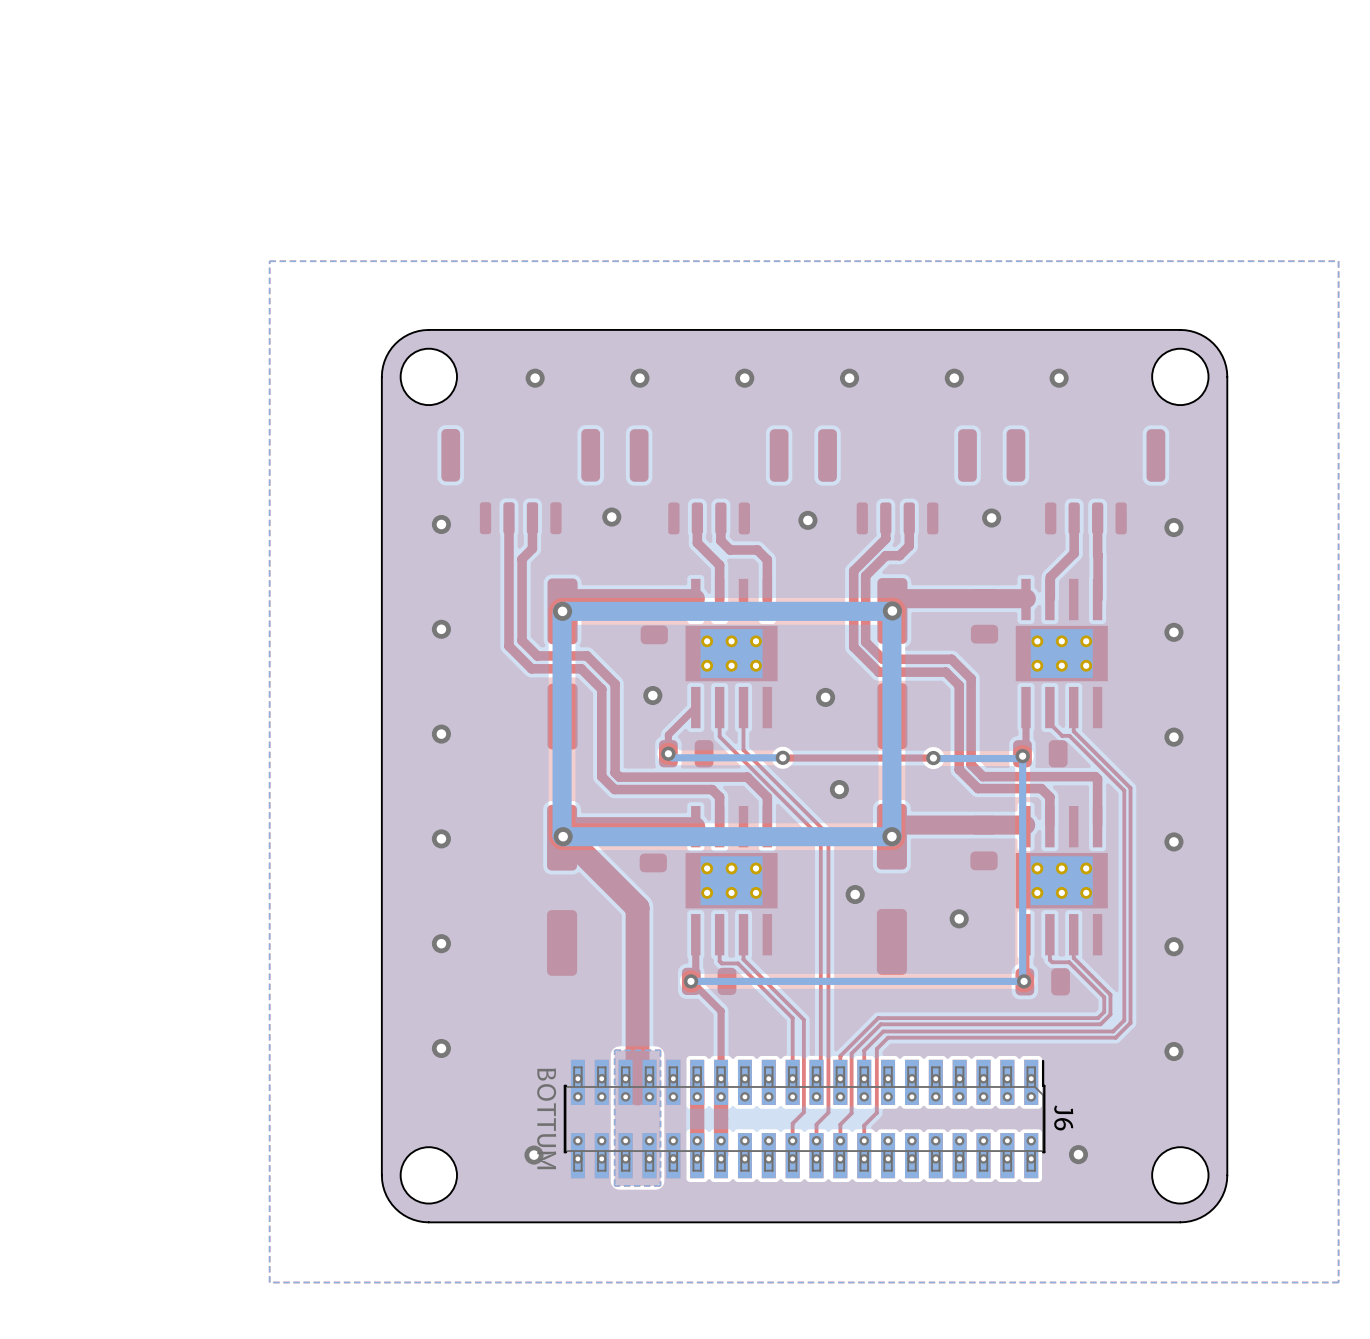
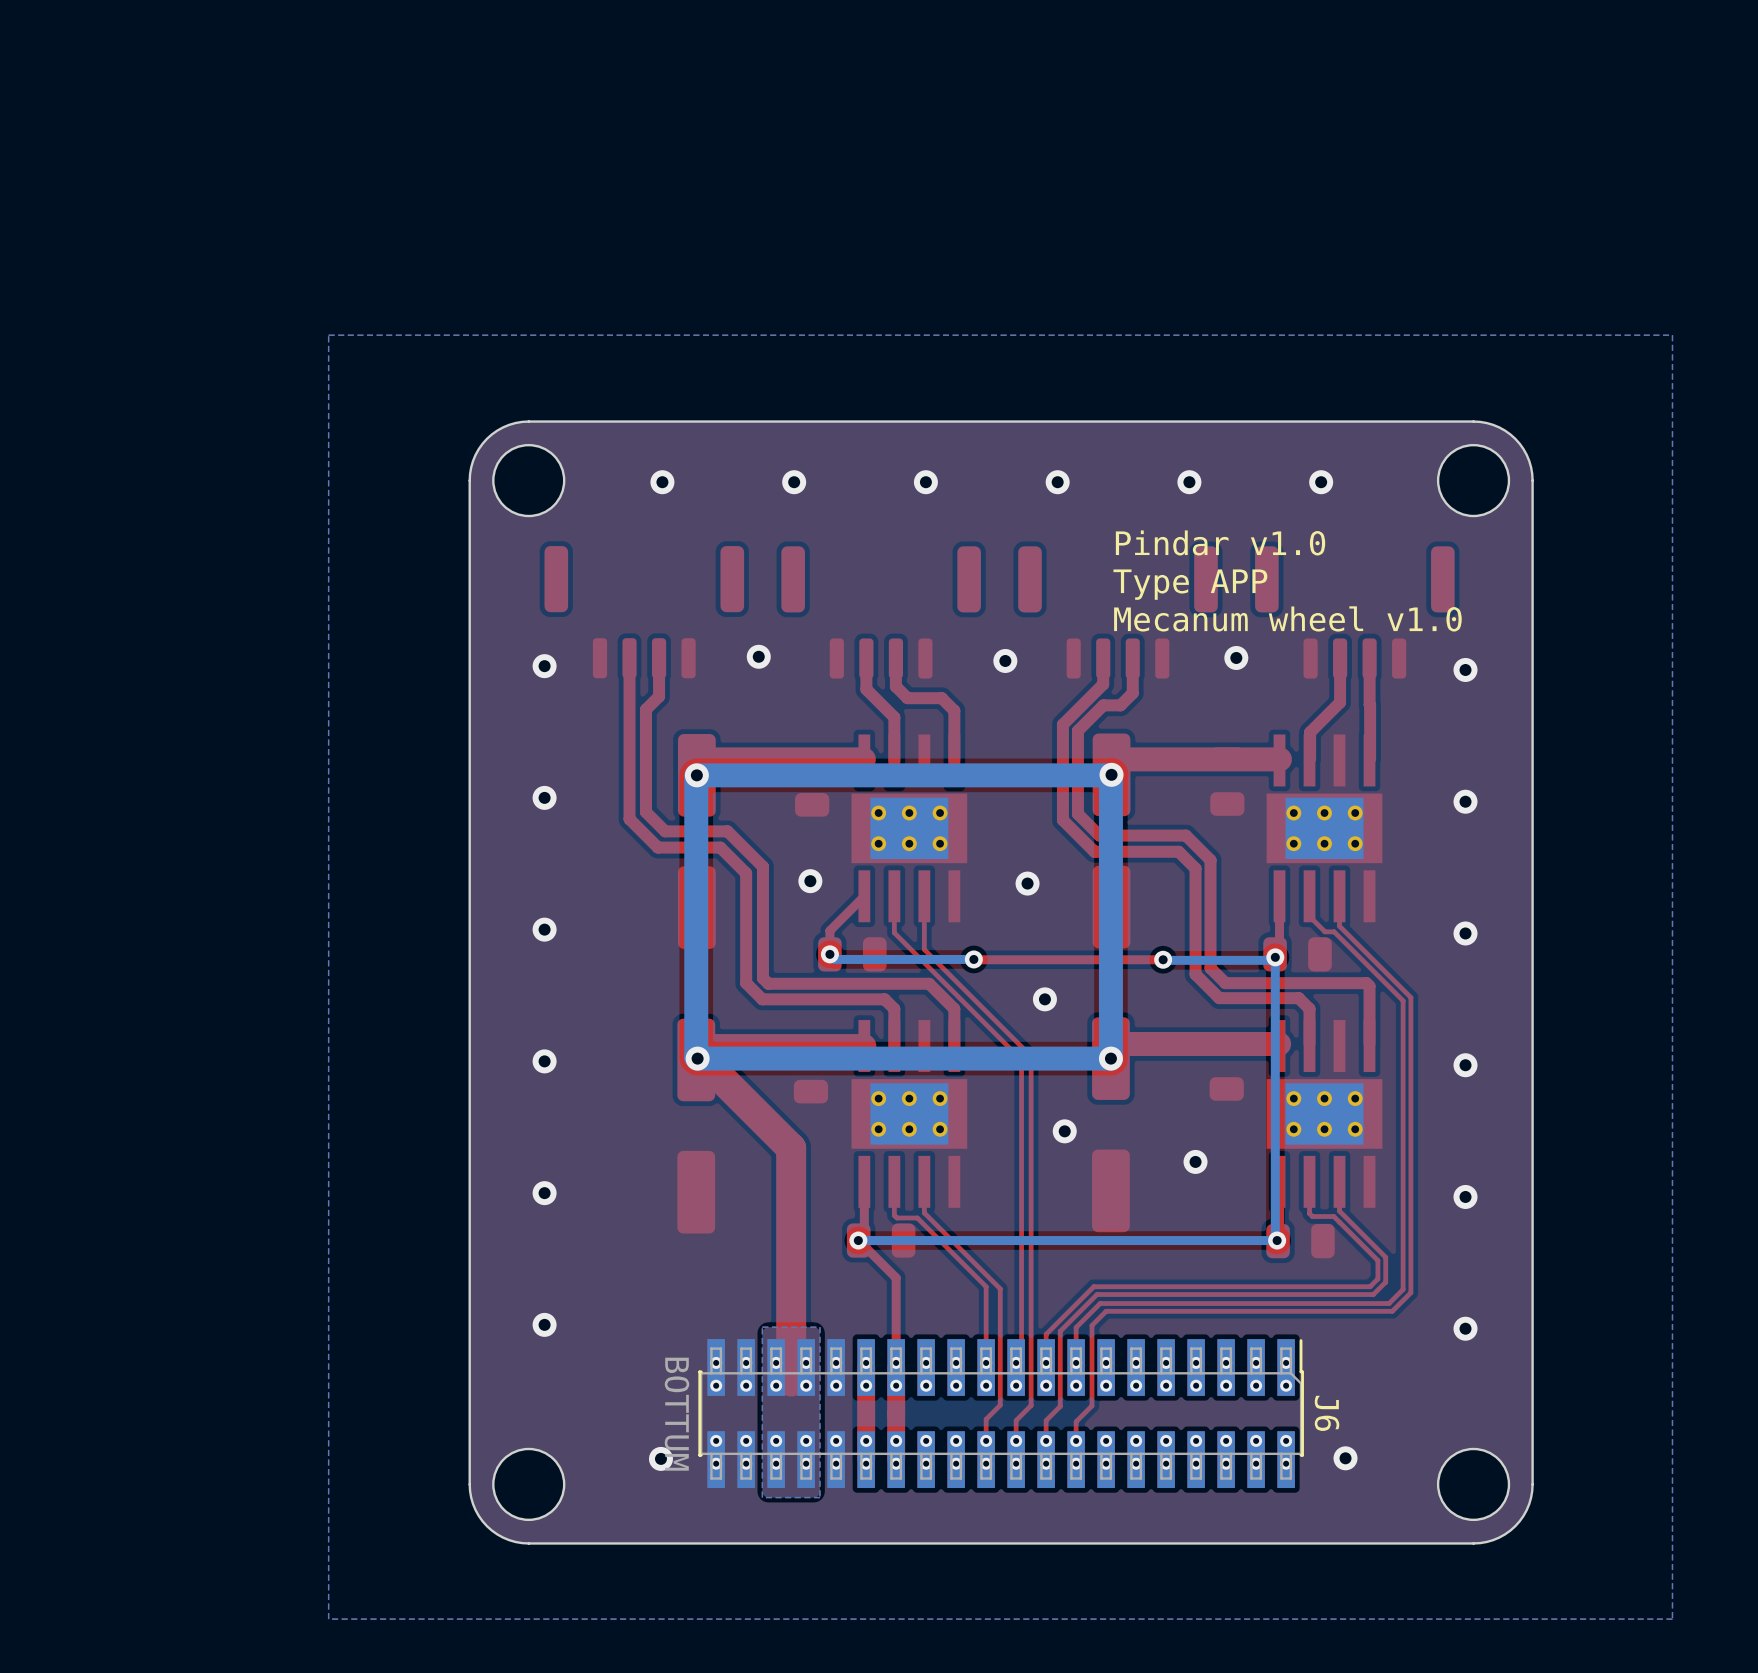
text: none -> Pindar v1.0 (1220, 542)
text: none -> Type APP (1190, 584)
text: none -> Mecanum wheel v1.0 (1287, 618)

